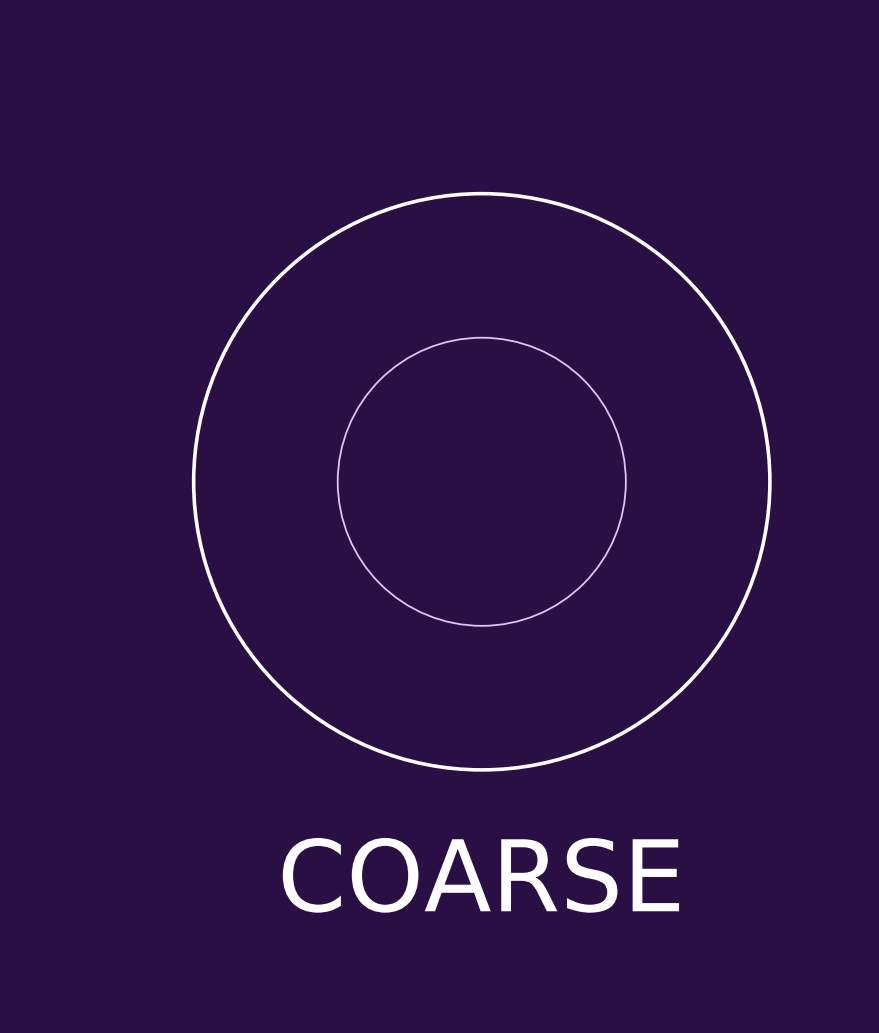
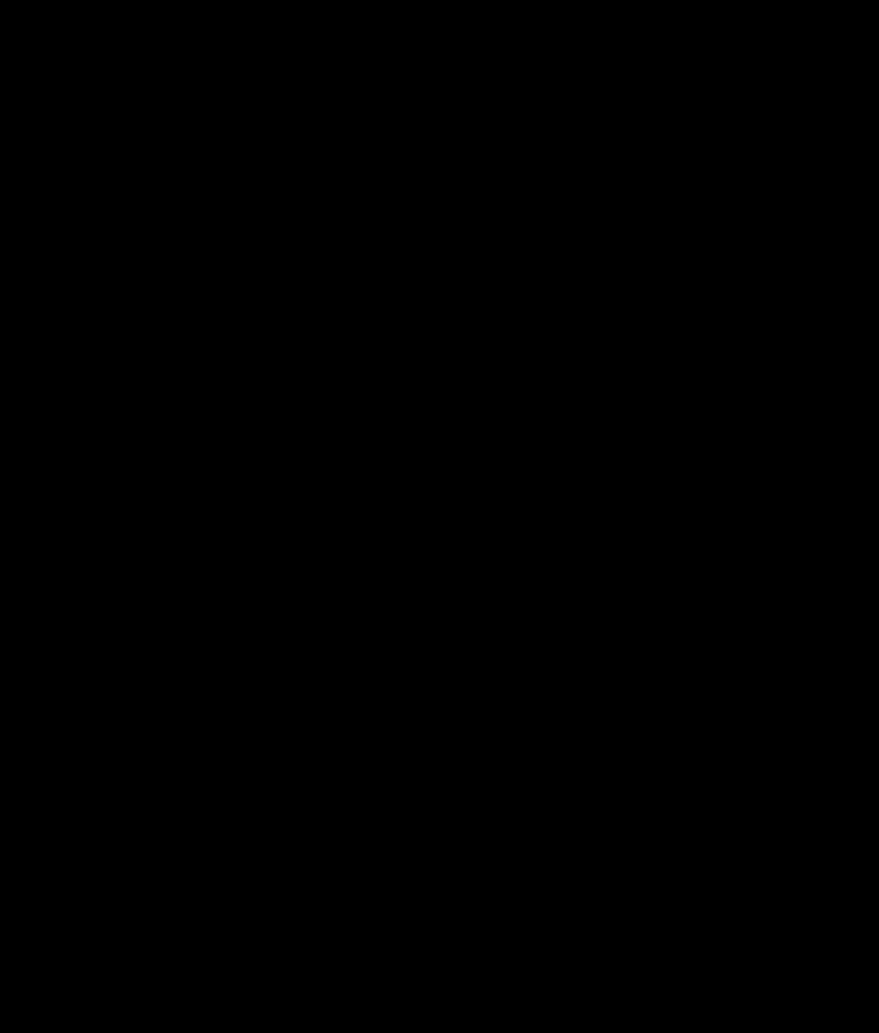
drawing: [191, 191, 772, 772] -> none
round board edge: [336, 336, 627, 627] -> none
text: COARSE (480, 875) -> none

